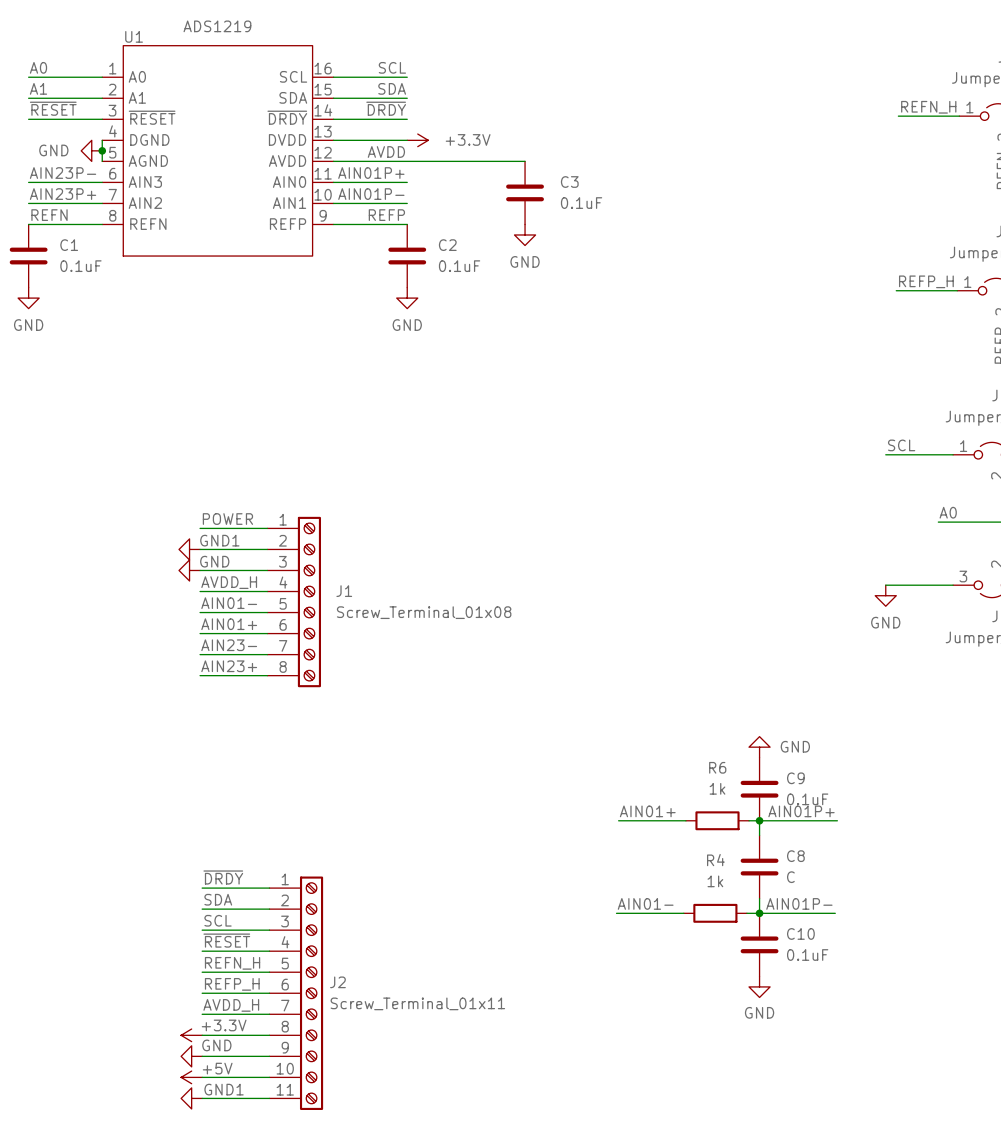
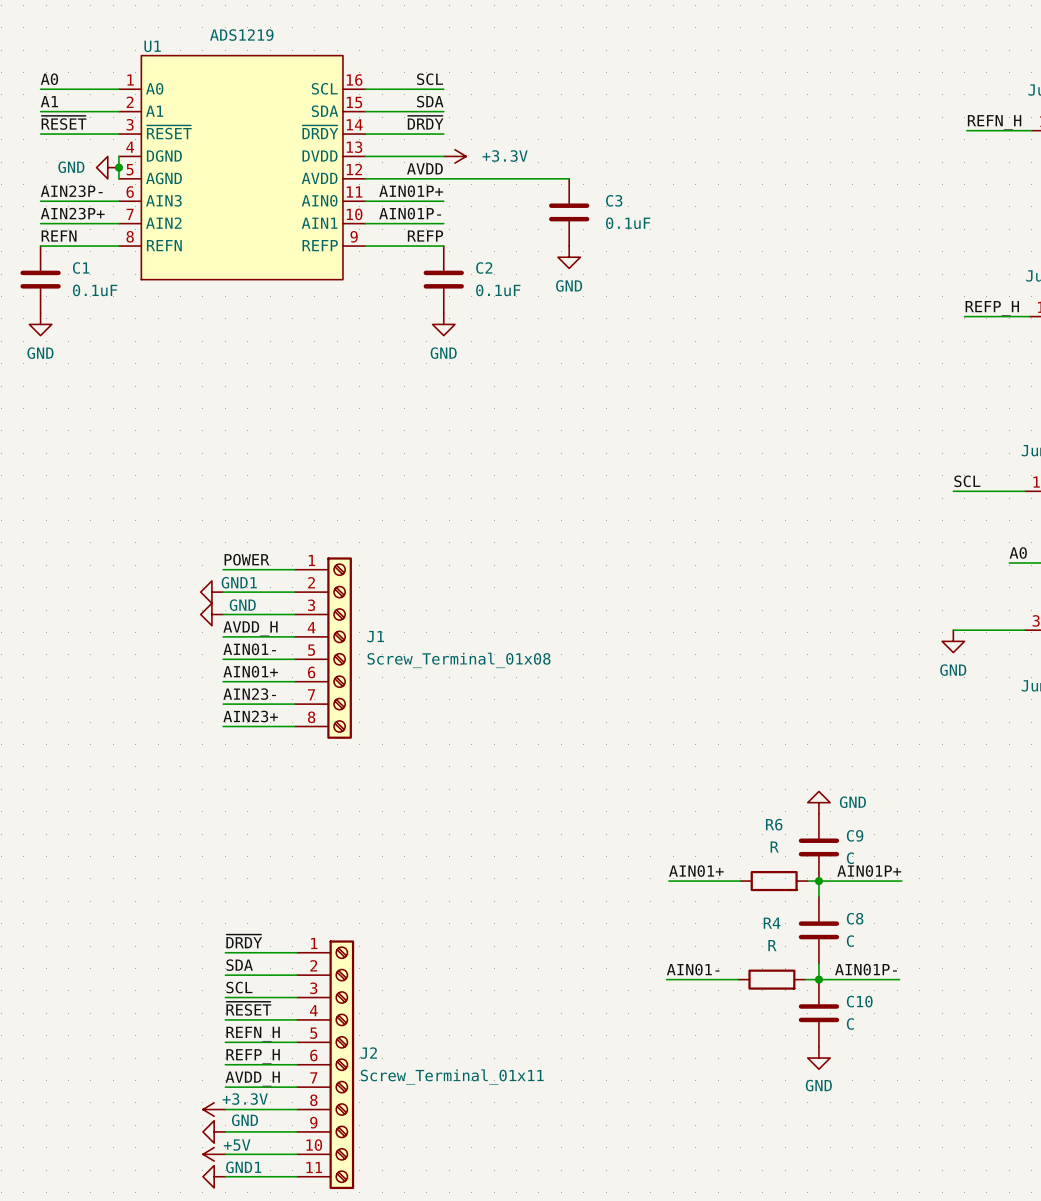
R6 value: 1k (717, 788) -> R (774, 847)
C9 value: 0.1uF (807, 799) -> C (850, 858)
R4 value: 1k (715, 881) -> R (772, 945)
C10 value: 0.1uF (807, 955) -> C (850, 1024)

